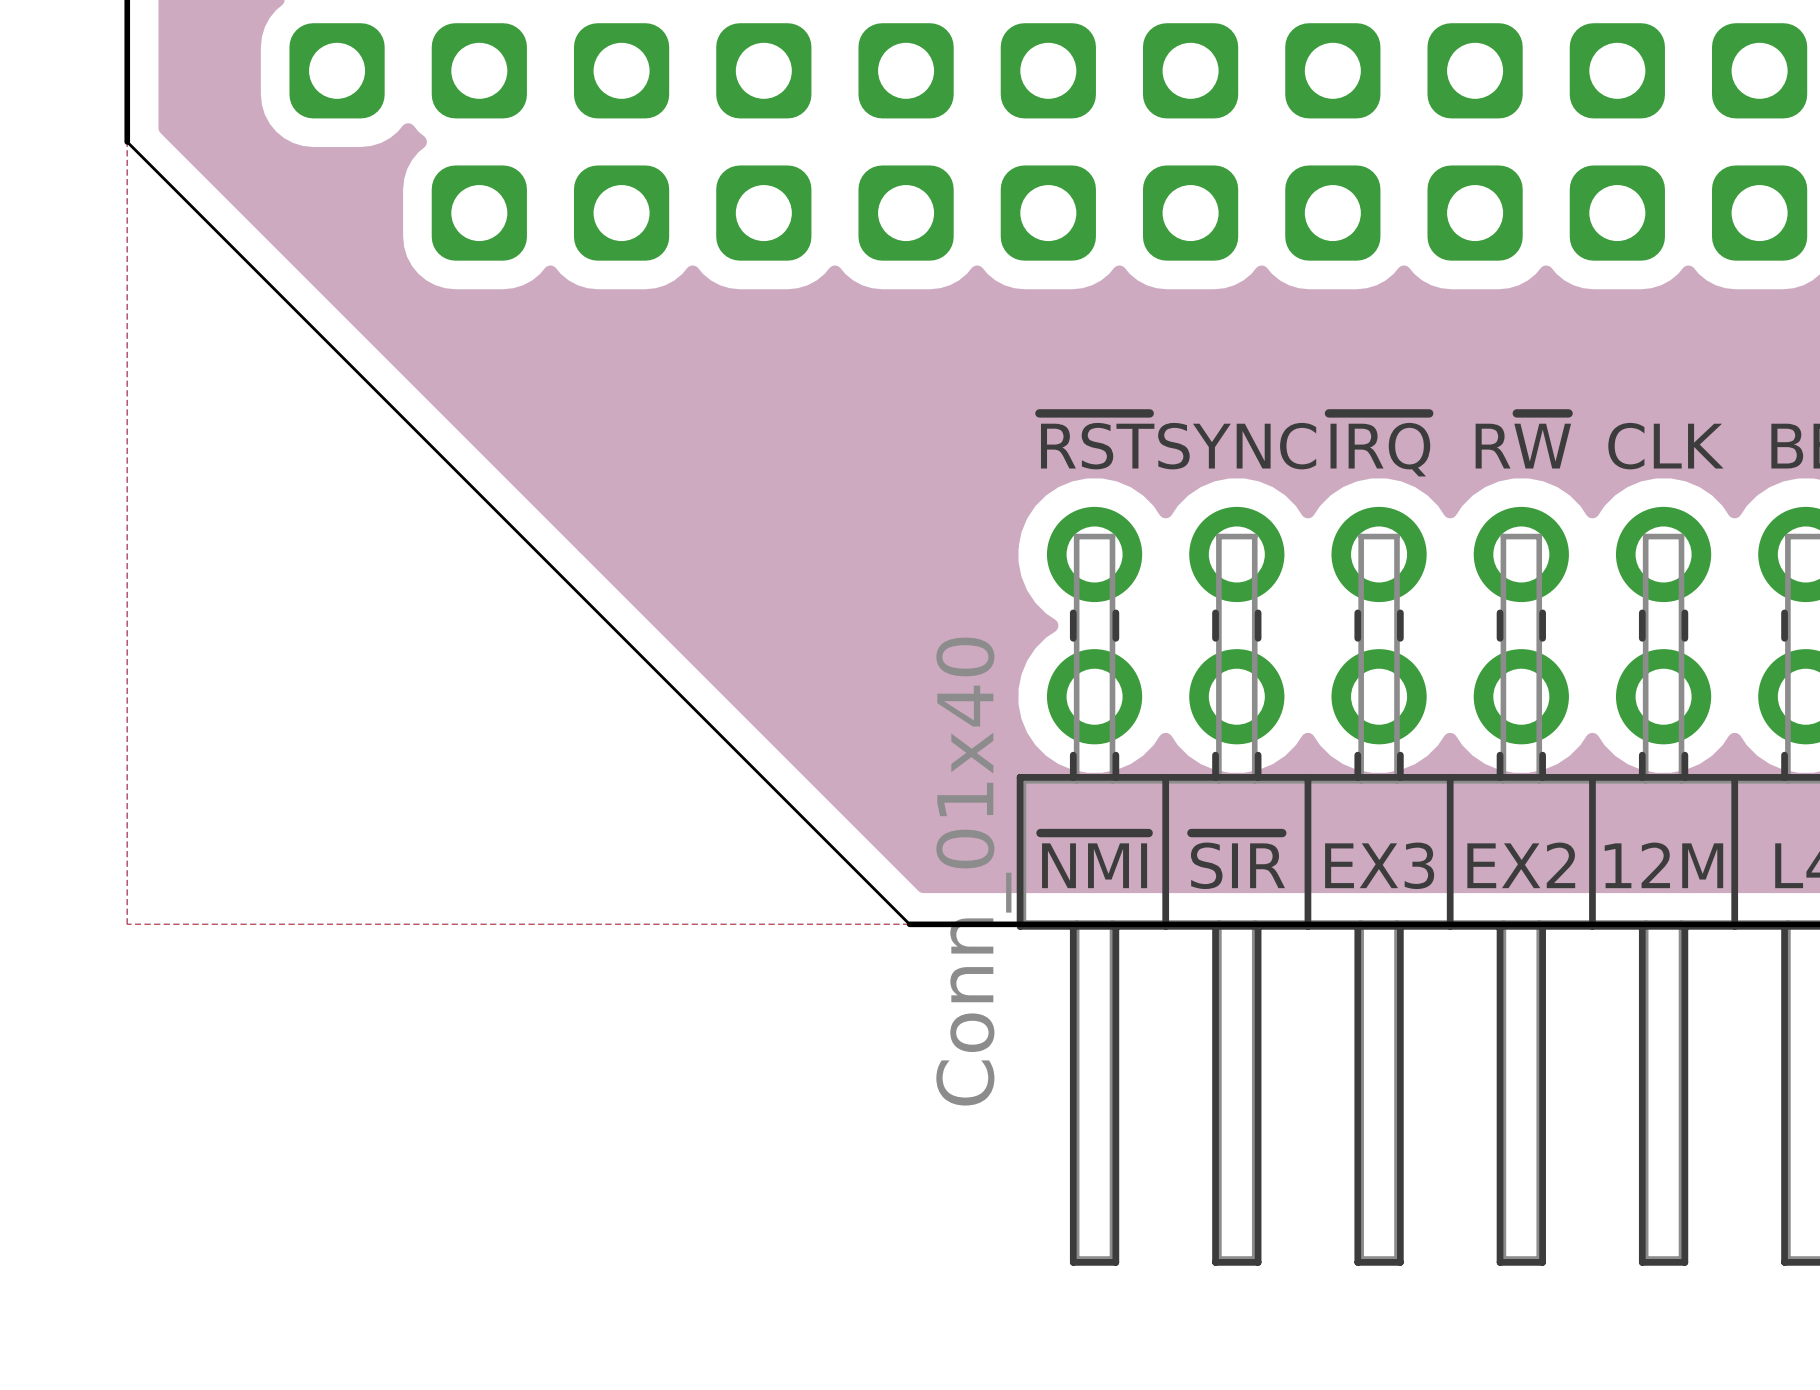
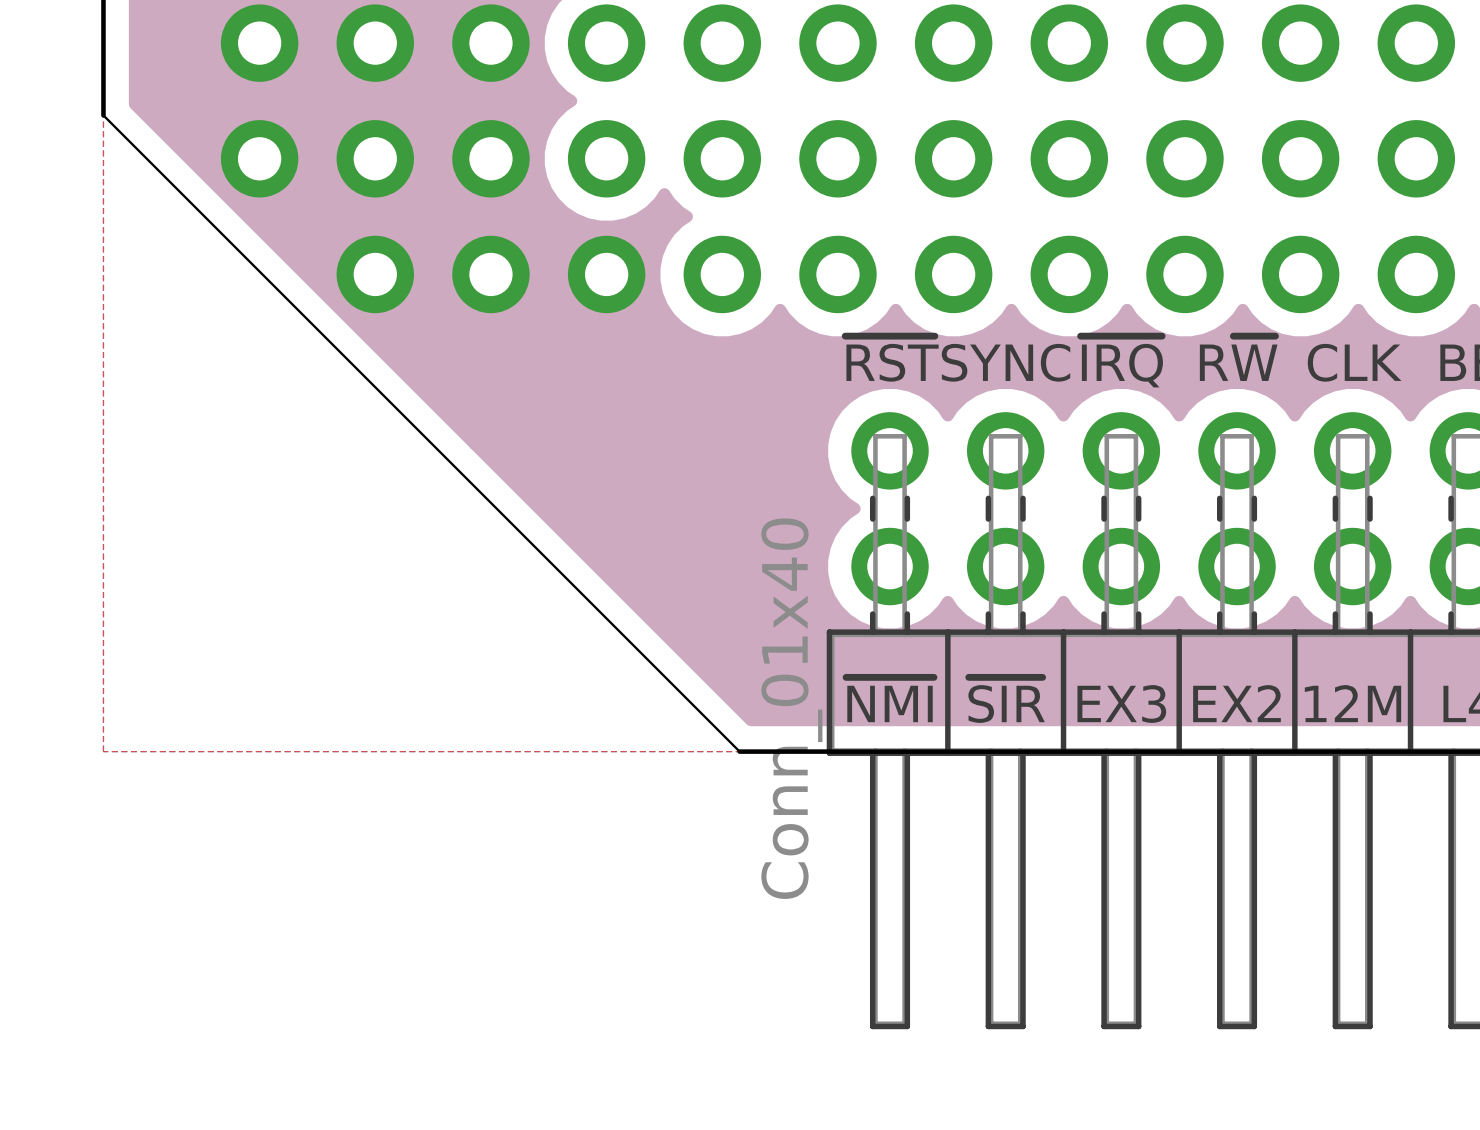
via: none -> (259, 43)
via: none -> (375, 43)
via: none -> (490, 43)
via: none -> (606, 43)
via: none -> (722, 43)
via: none -> (837, 43)
via: none -> (953, 43)
via: none -> (1069, 43)
via: none -> (1184, 43)
via: none -> (1300, 43)
via: none -> (1416, 43)
part: (337, 70) -> none
part: (479, 70) -> none
part: (621, 70) -> none
part: (763, 70) -> none
part: (906, 70) -> none
part: (1048, 70) -> none
part: (1190, 70) -> none
part: (1332, 70) -> none
part: (1475, 70) -> none
part: (1617, 70) -> none
part: (1759, 70) -> none
via: none -> (259, 158)
via: none -> (375, 158)
via: none -> (490, 158)
via: none -> (606, 158)
via: none -> (722, 158)
via: none -> (837, 158)
via: none -> (953, 158)
via: none -> (1069, 158)
via: none -> (1184, 158)
via: none -> (1300, 158)
via: none -> (1416, 158)
part: (479, 213) -> none
part: (621, 213) -> none
part: (763, 213) -> none
part: (906, 213) -> none
part: (1048, 213) -> none
part: (1190, 213) -> none
part: (1332, 213) -> none
part: (1475, 213) -> none
part: (1617, 213) -> none
part: (1759, 213) -> none
via: none -> (375, 274)
via: none -> (490, 274)
via: none -> (606, 274)
via: none -> (722, 274)
via: none -> (837, 274)
via: none -> (953, 274)
via: none -> (1069, 274)
via: none -> (1184, 274)
via: none -> (1300, 274)
via: none -> (1416, 274)

